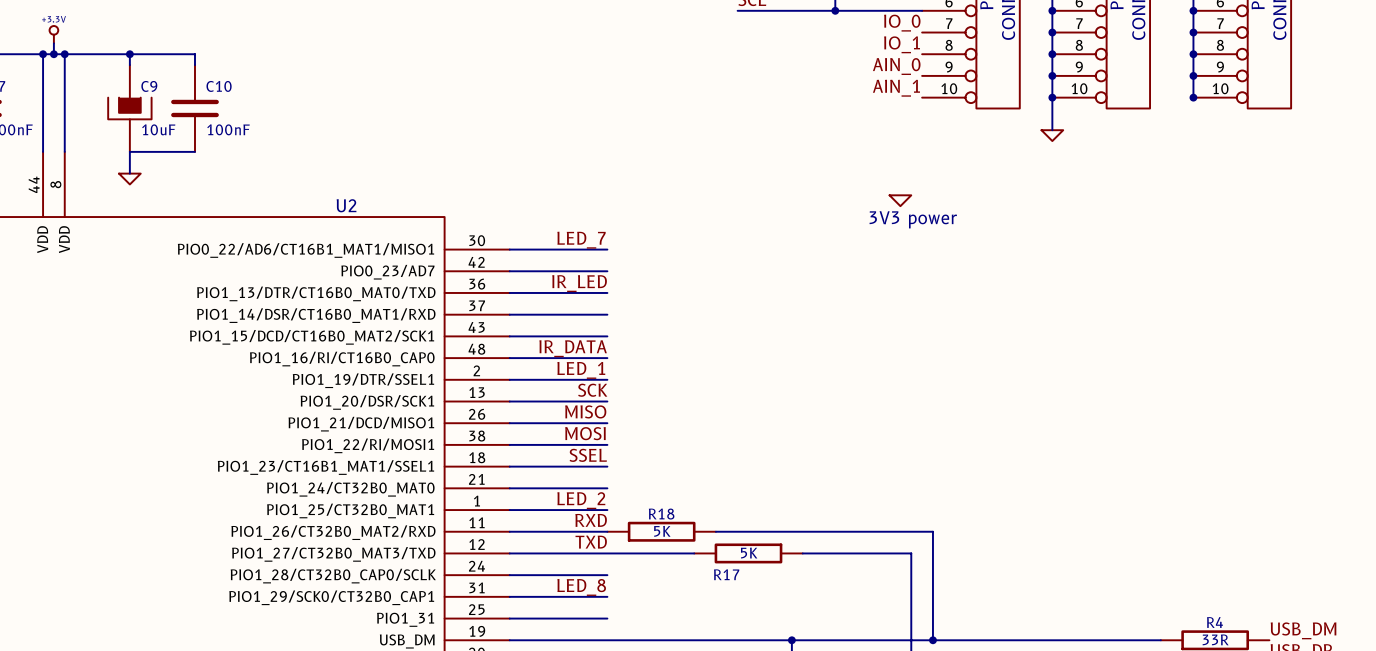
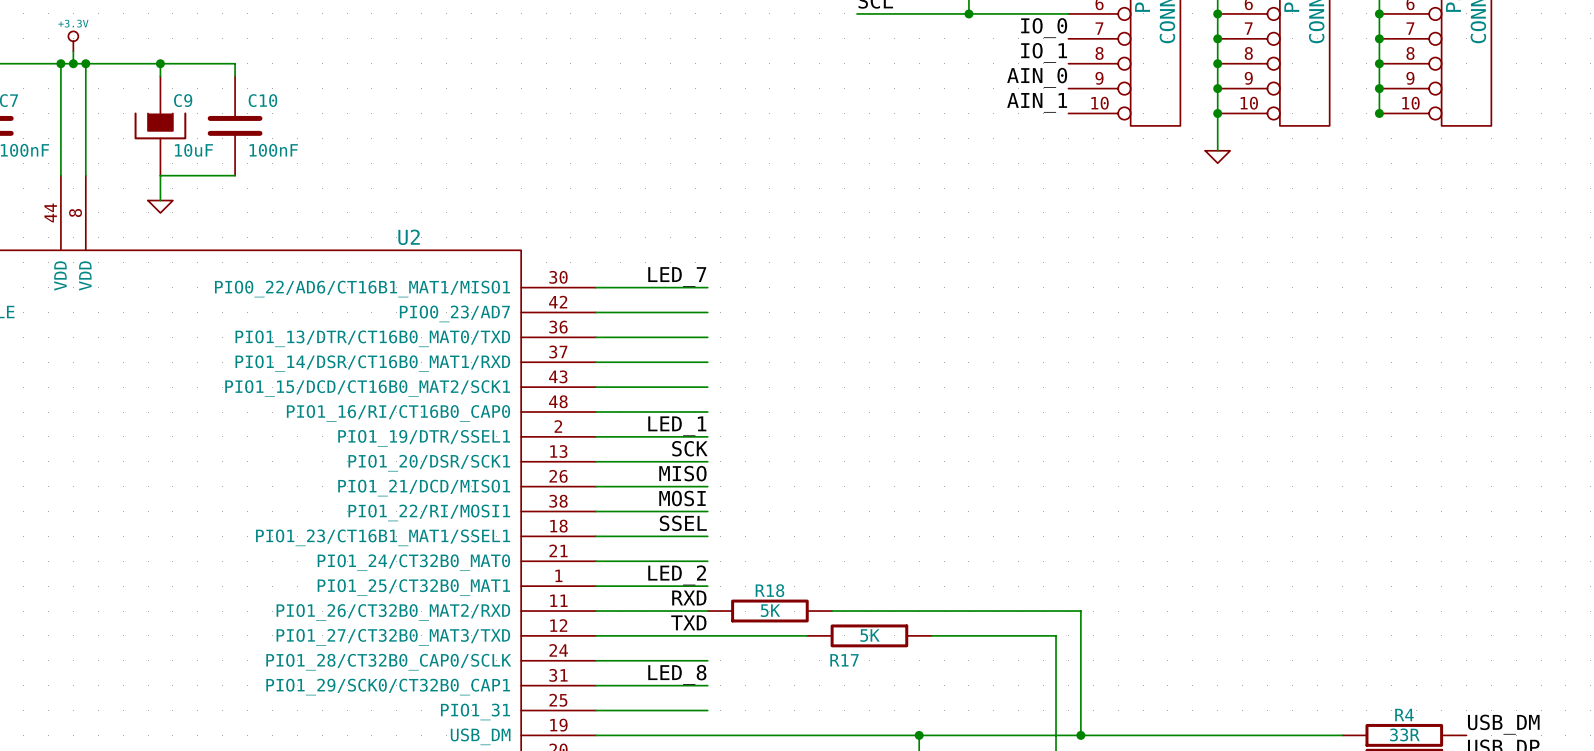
power symbol: (900, 200) -> none
text: 3V3 power (913, 219) -> none
label: IR_LED (579, 283) -> none
label: IR_DATA (573, 348) -> none

